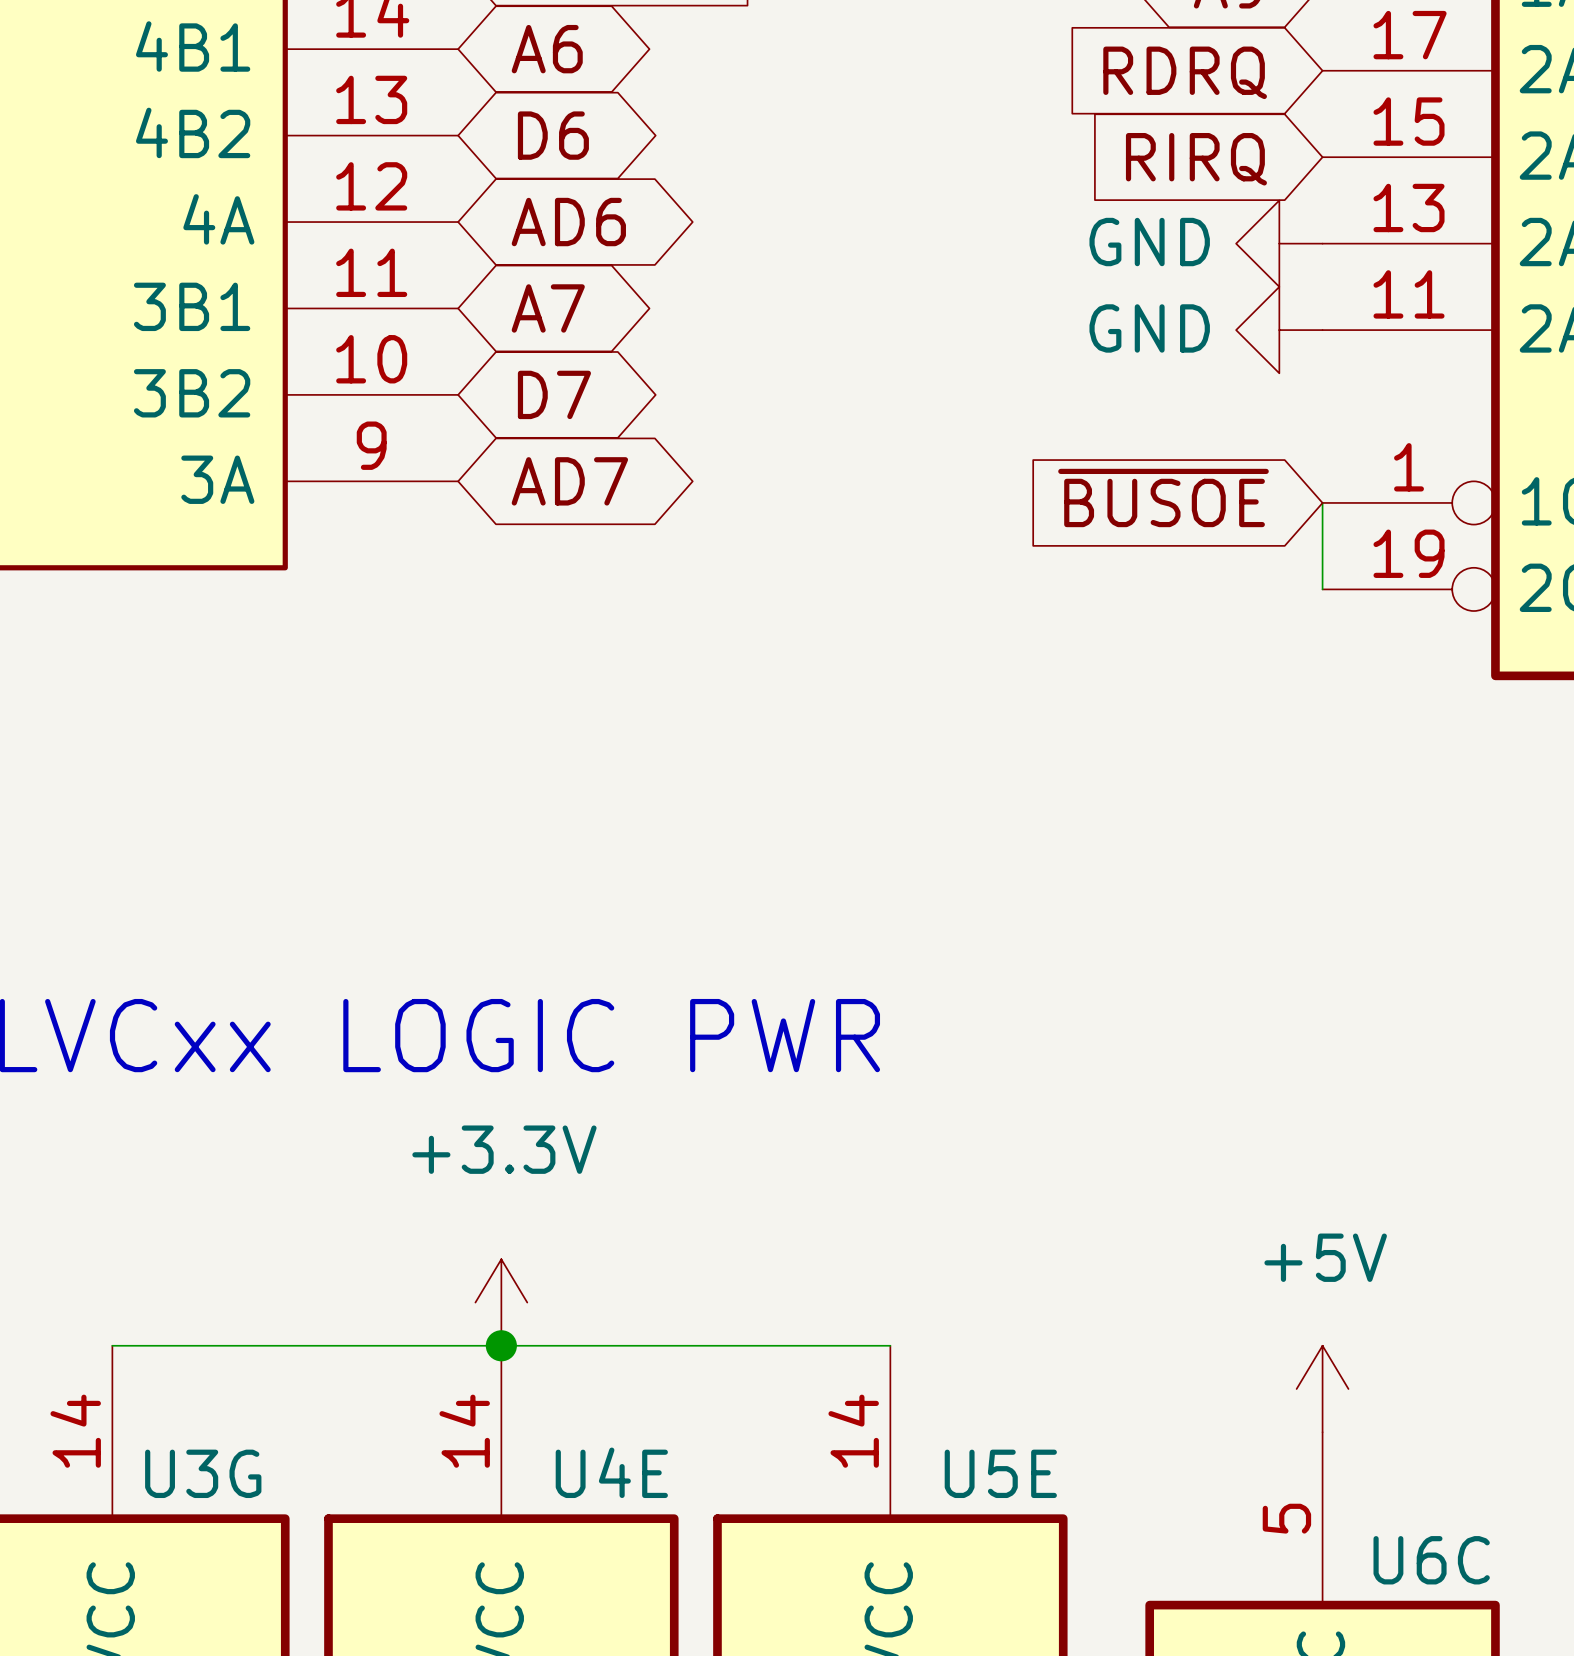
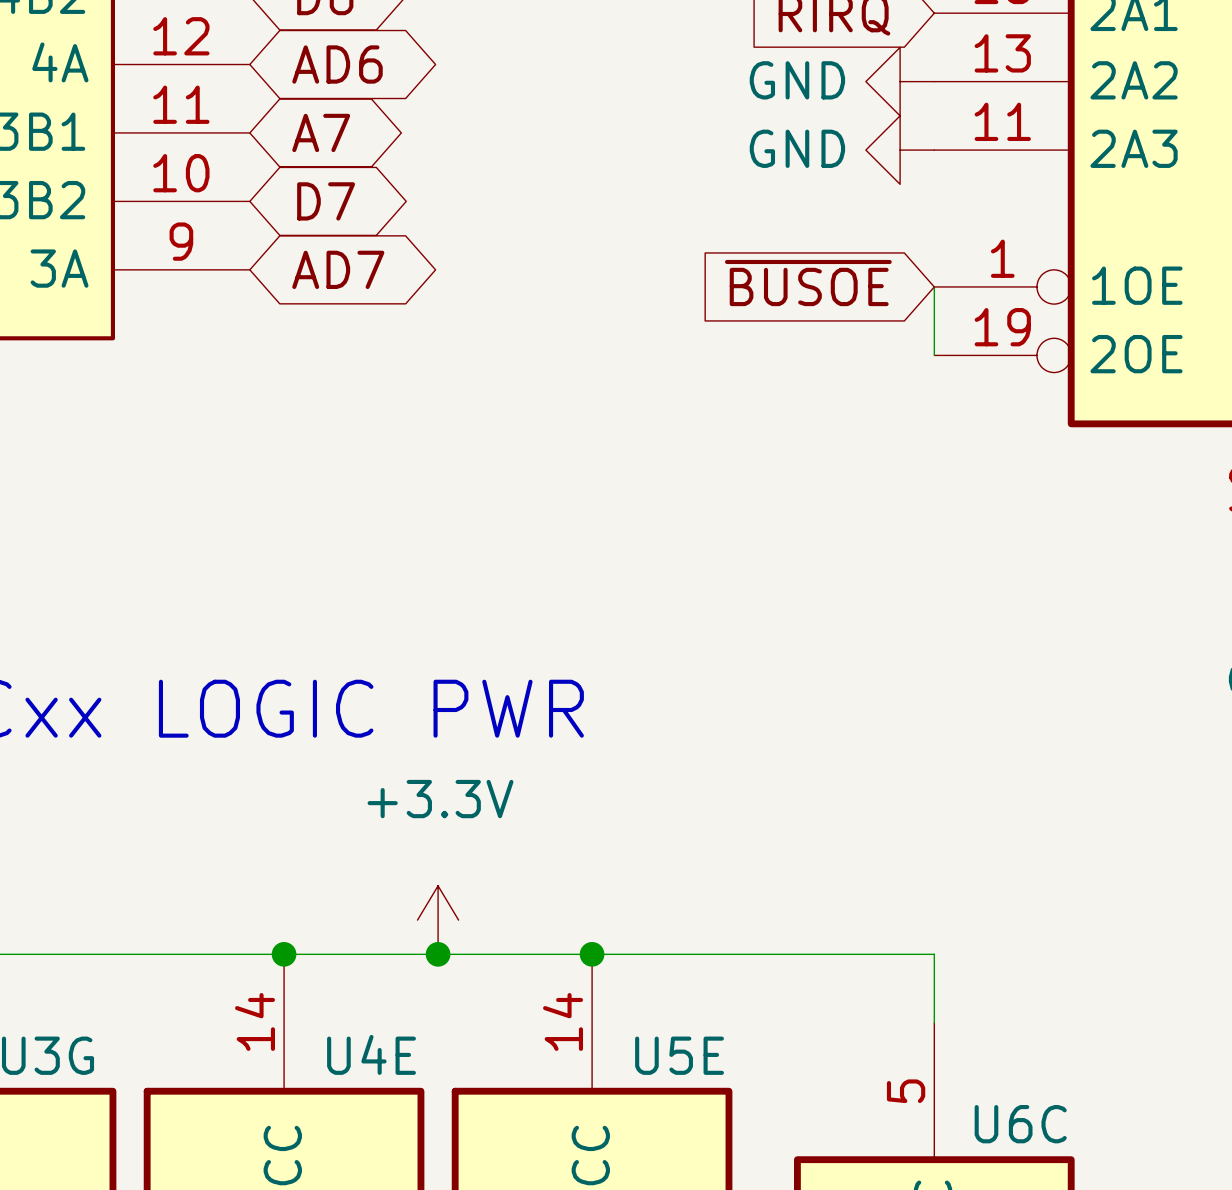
power symbol position: +3.3V (501, 1302) -> +3.3V (438, 920)
junction: none -> (438, 954)
wire: none -> (592, 954) (934, 954) (934, 1022)
junction: none -> (592, 954)
power symbol: +5V (1322, 1389) -> none

